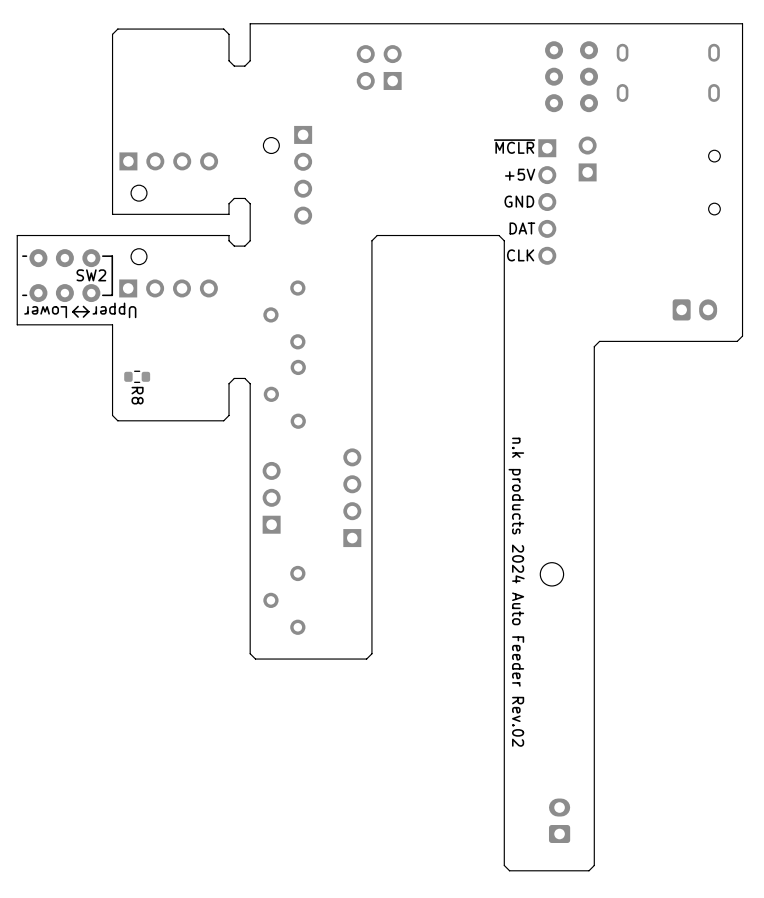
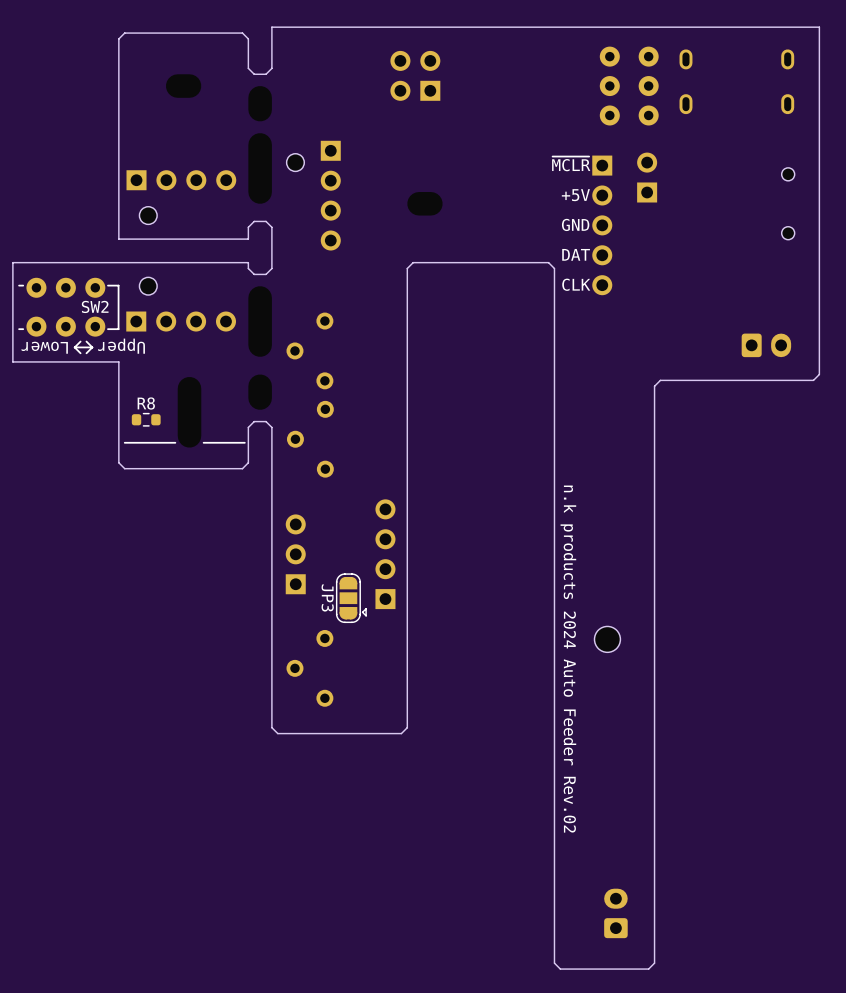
R8 name rotation: 0° (137, 395) -> 90° counterclockwise (146, 403)
R8 name position: R8 (137, 395) -> R8 (146, 403)
line: none -> (175, 442) (124, 442)
line: none -> (244, 442) (203, 442)
JP3: none -> (351, 598)

